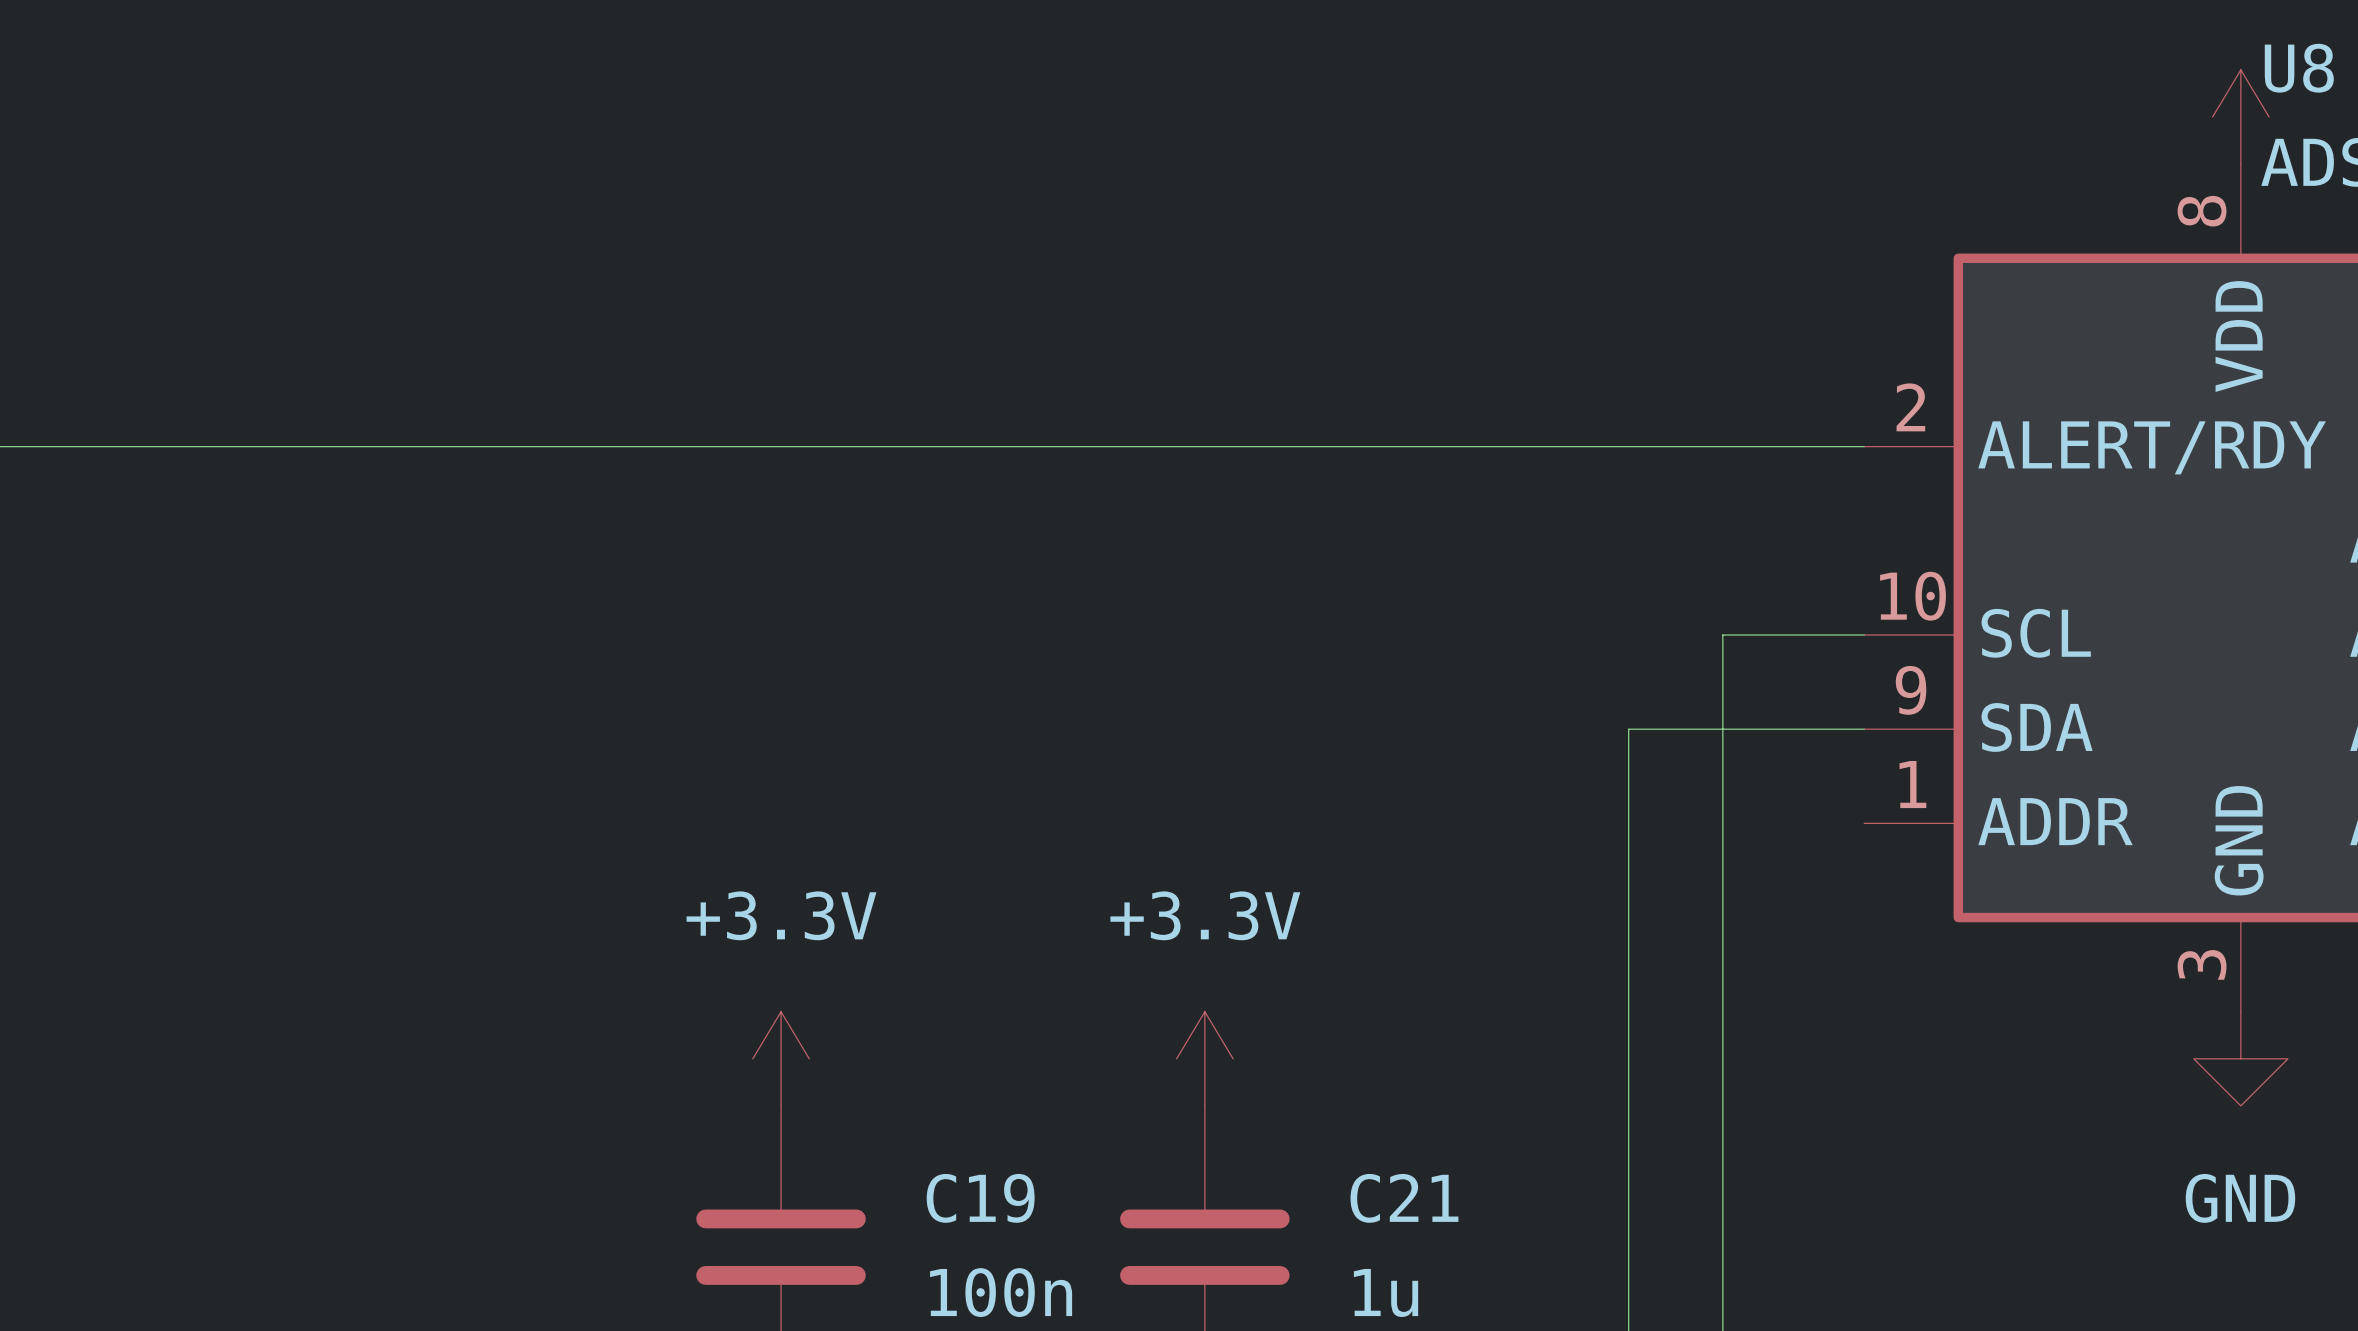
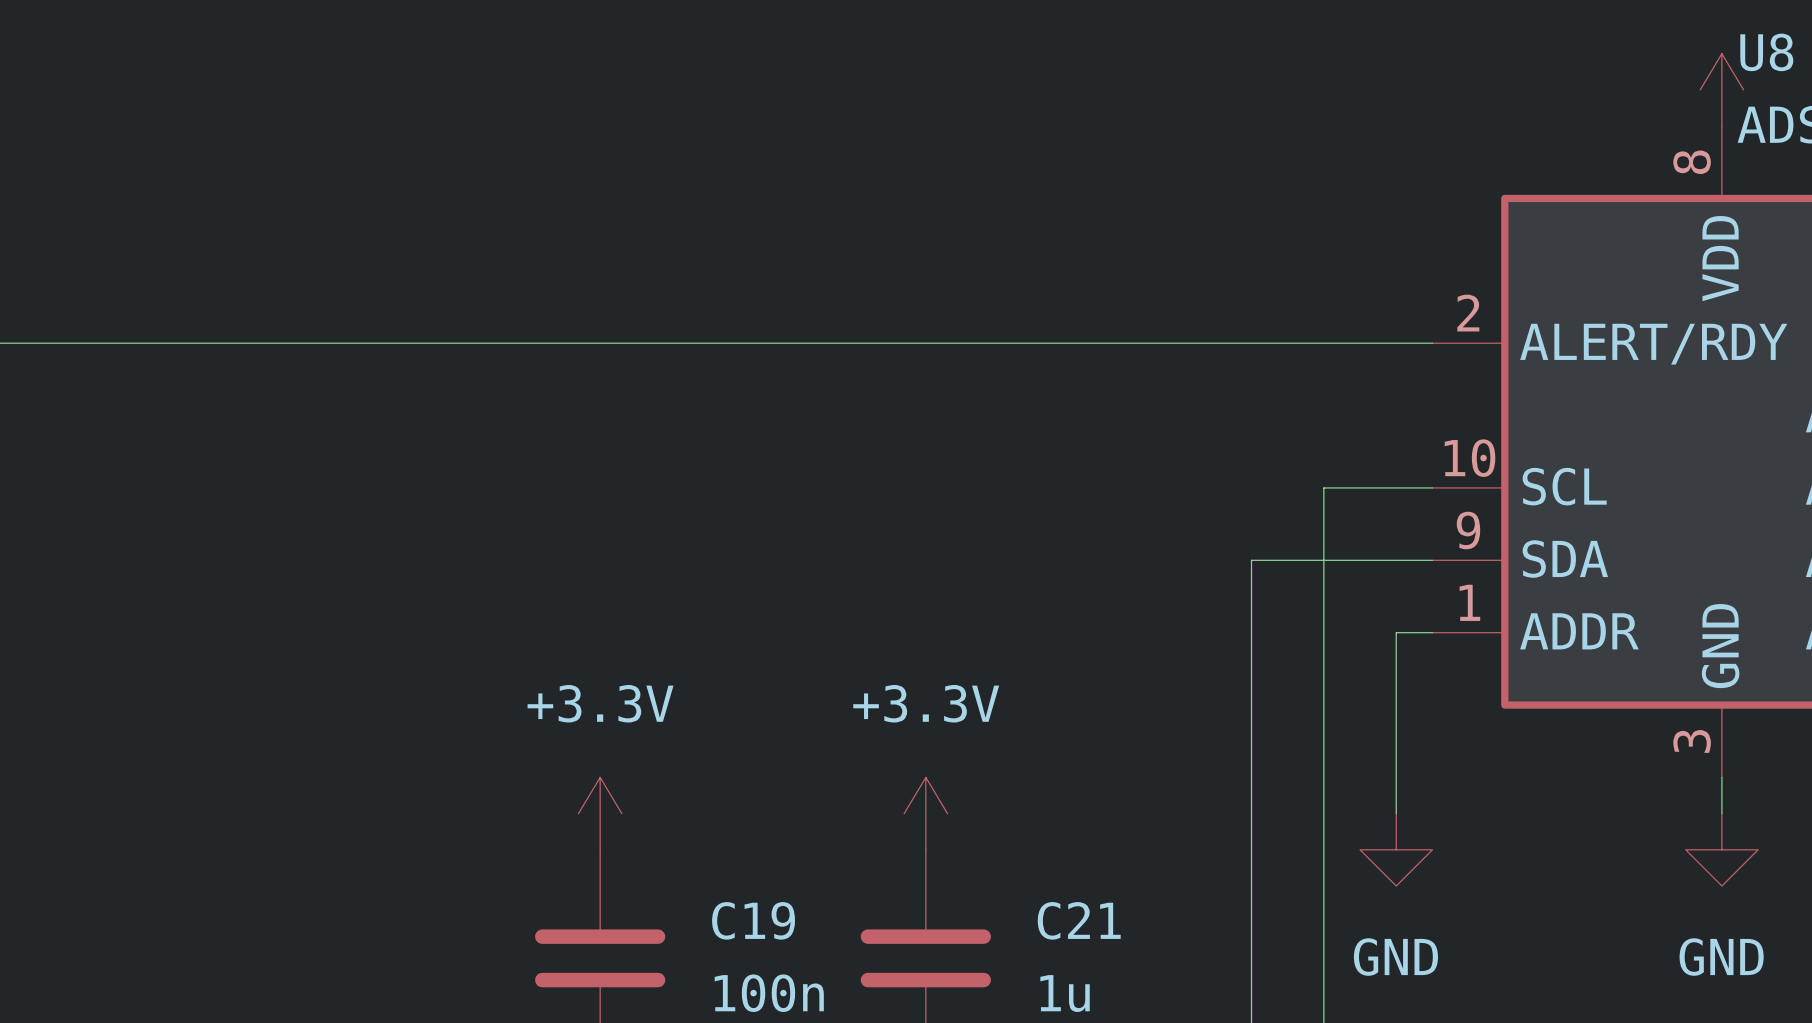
wire: none -> (1432, 632) (1396, 632) (1396, 813)
power symbol position: GND (2240, 1058) -> GND (1721, 849)
power symbol: none -> GND (1396, 849)

